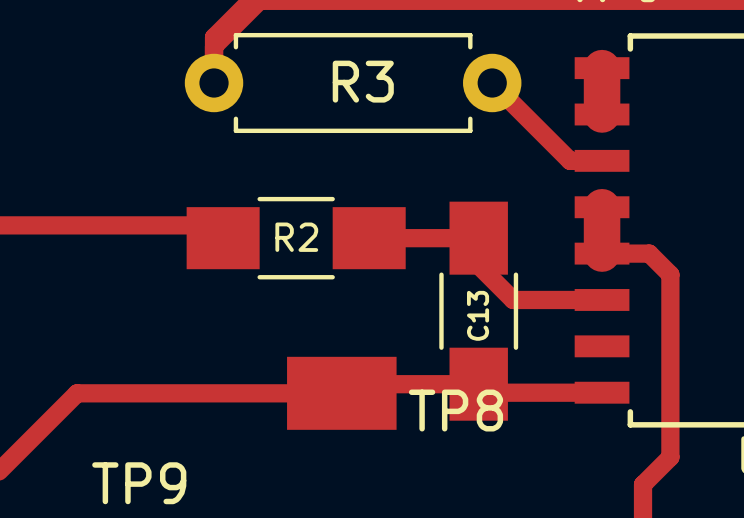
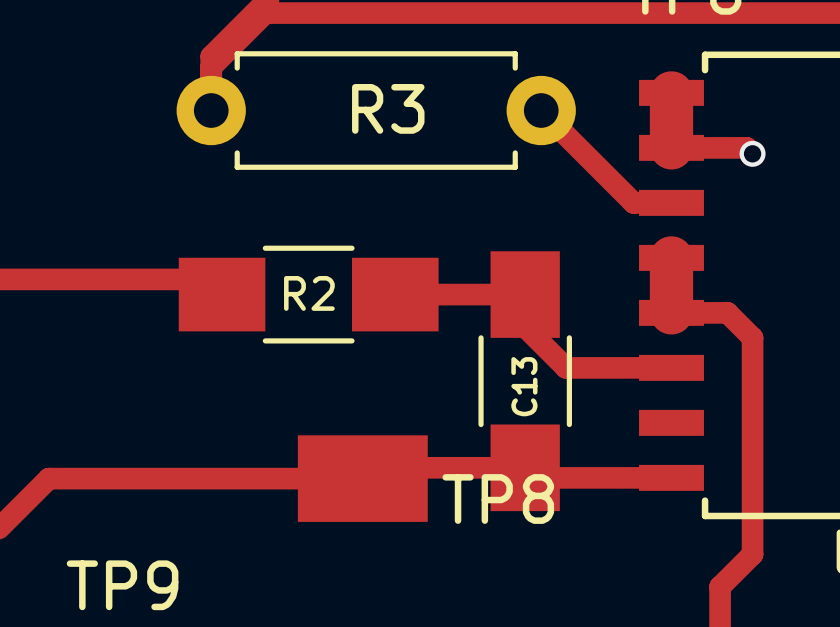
track: none -> (671, 147) (746, 147) (752, 153)
via: none -> (752, 153)

